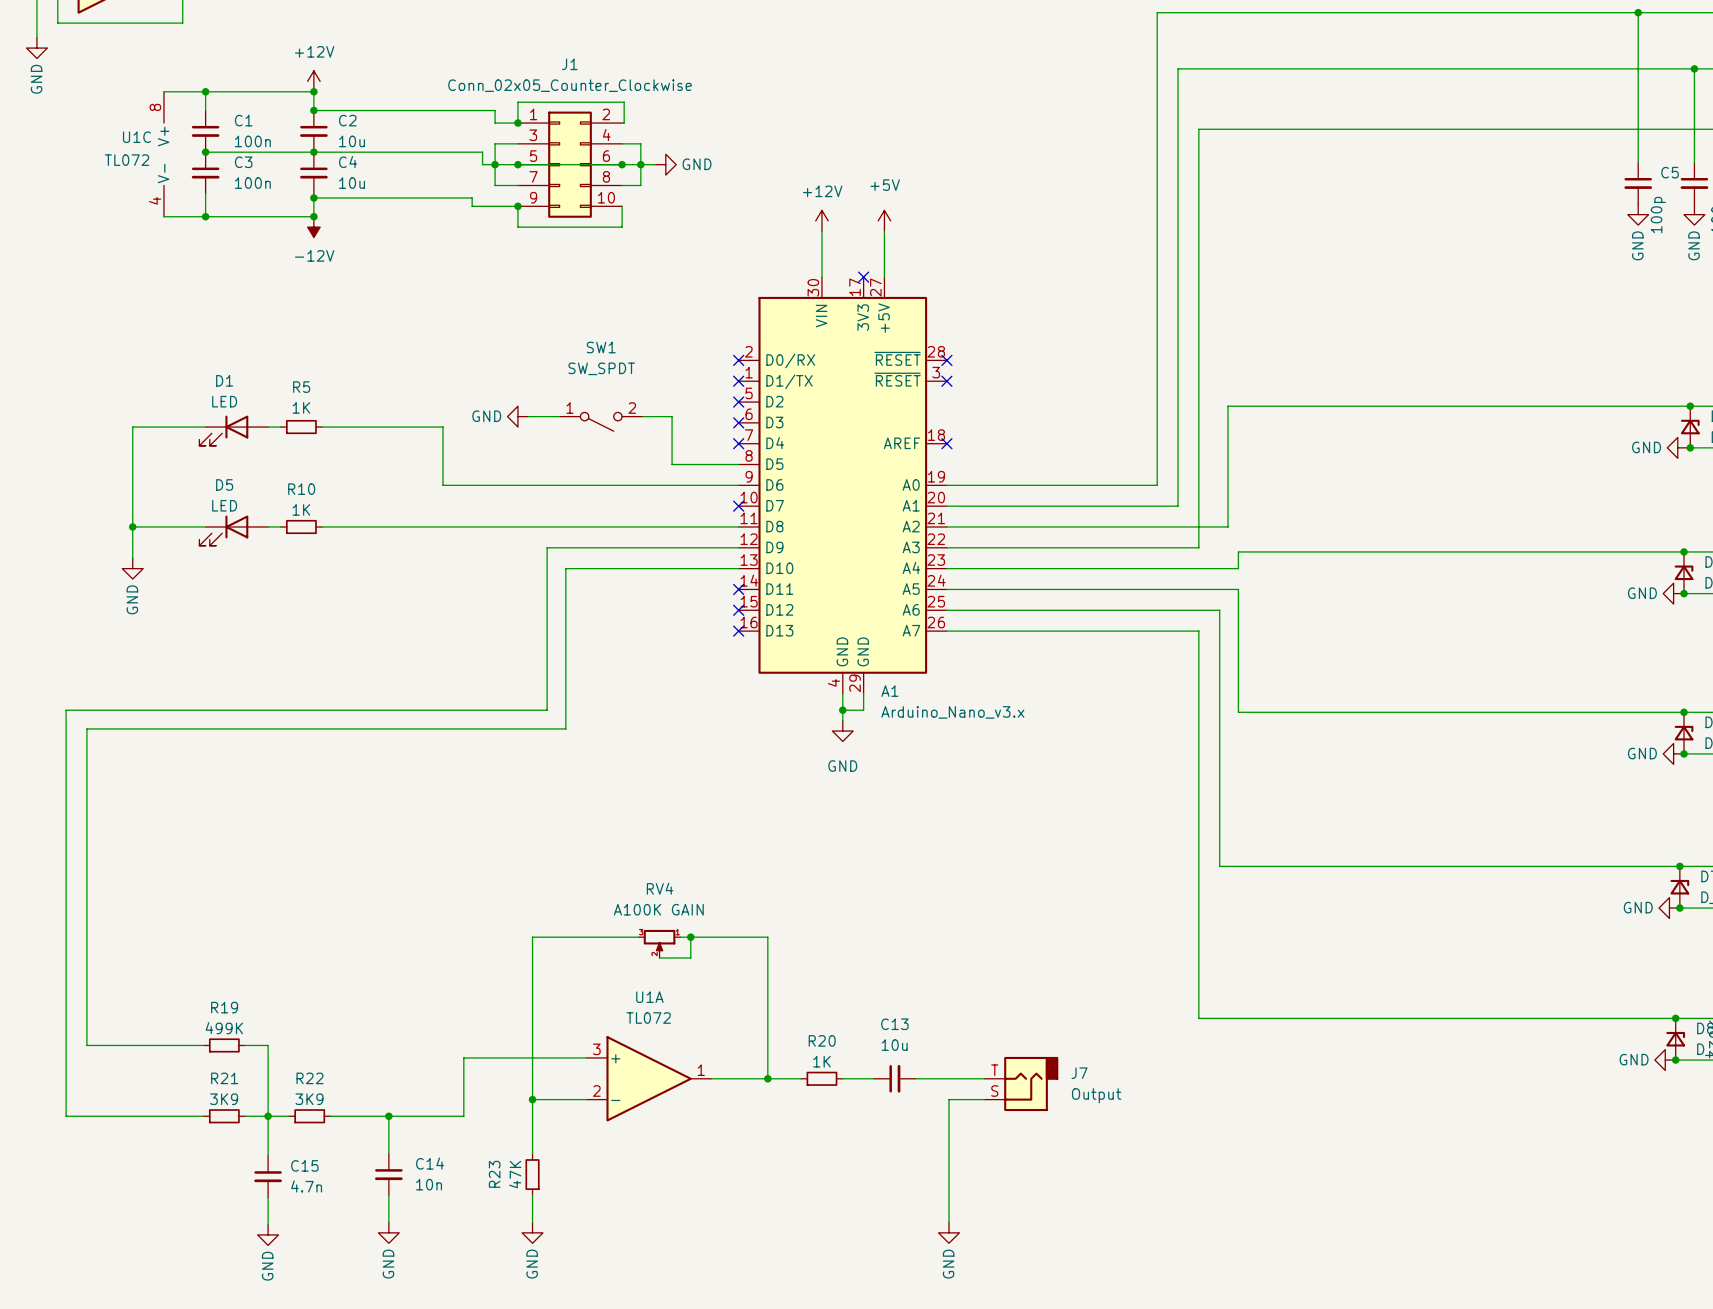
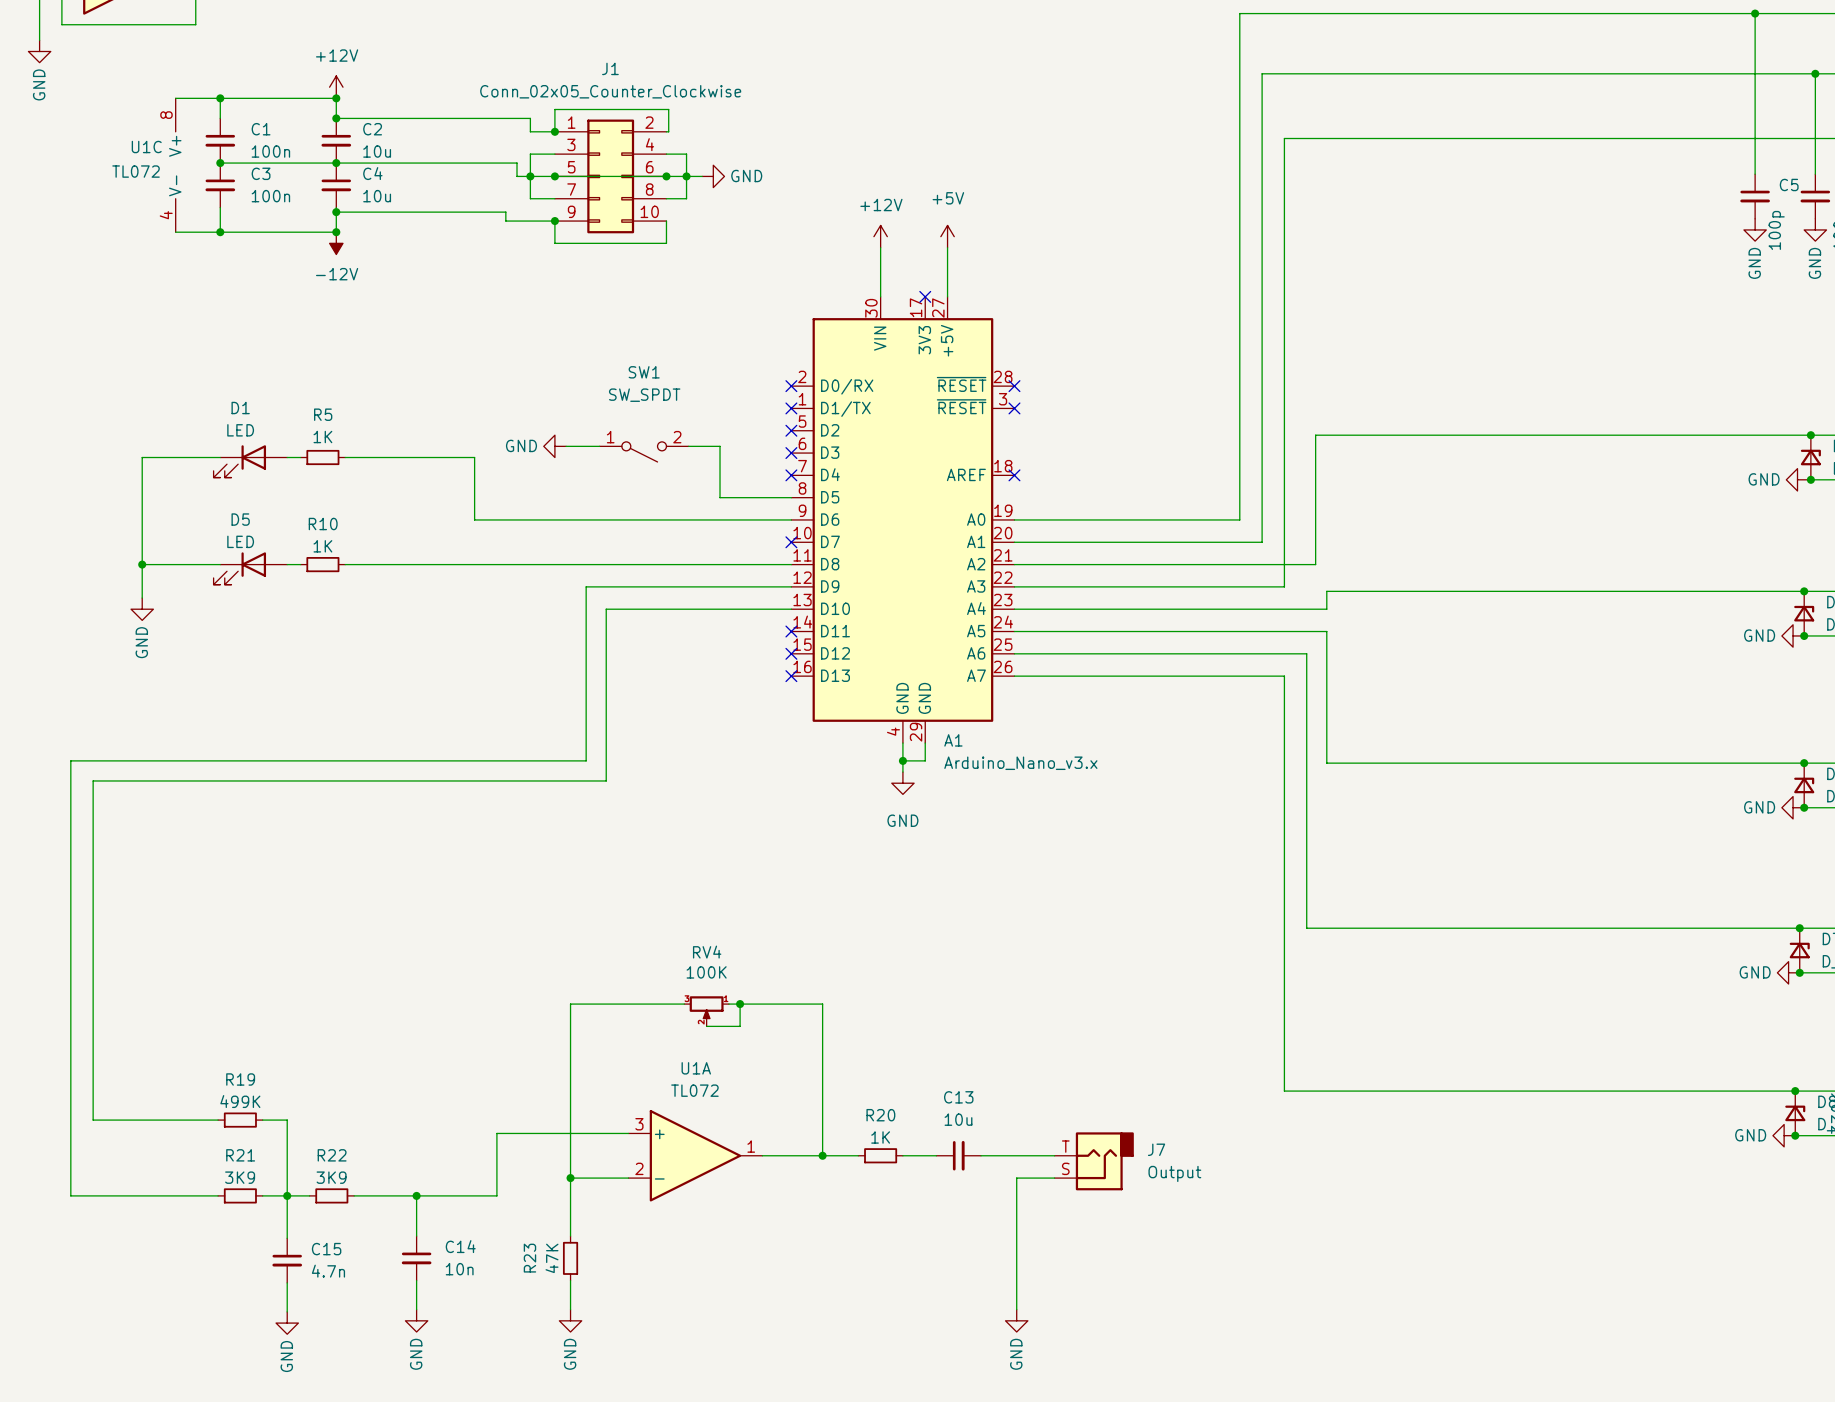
RV4 value: A100K GAIN (658, 909) -> 100K (706, 972)

